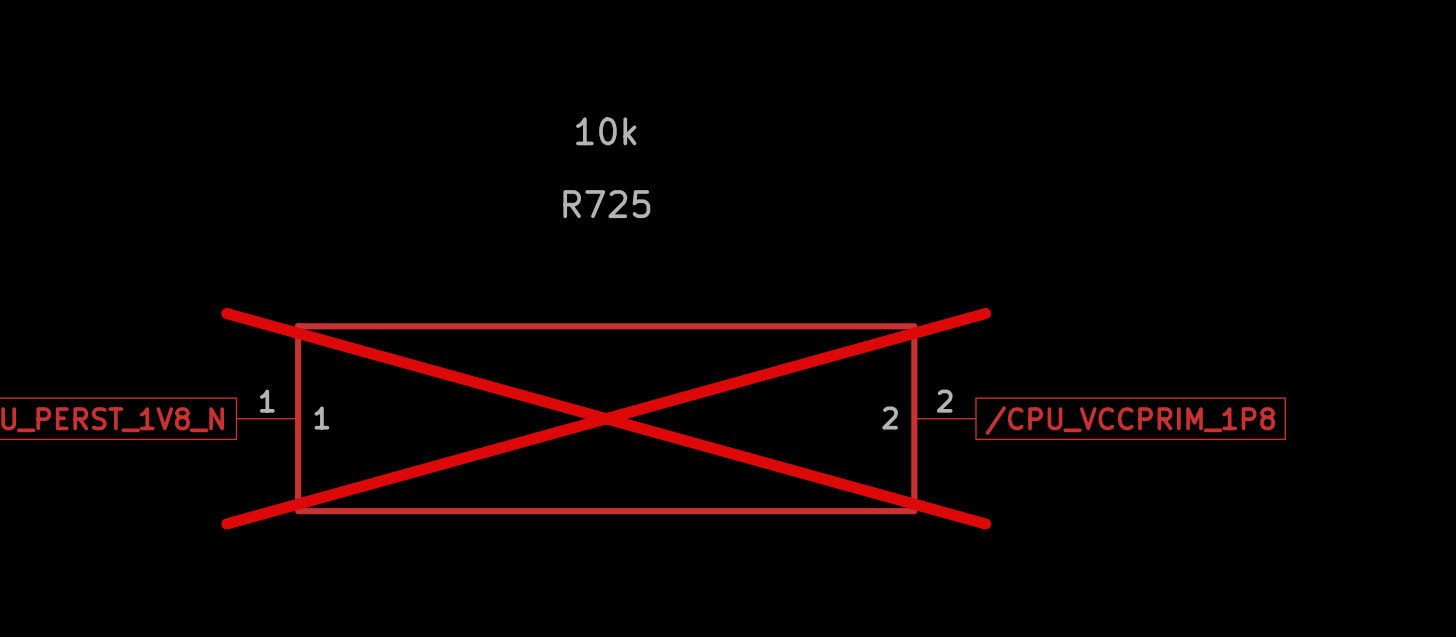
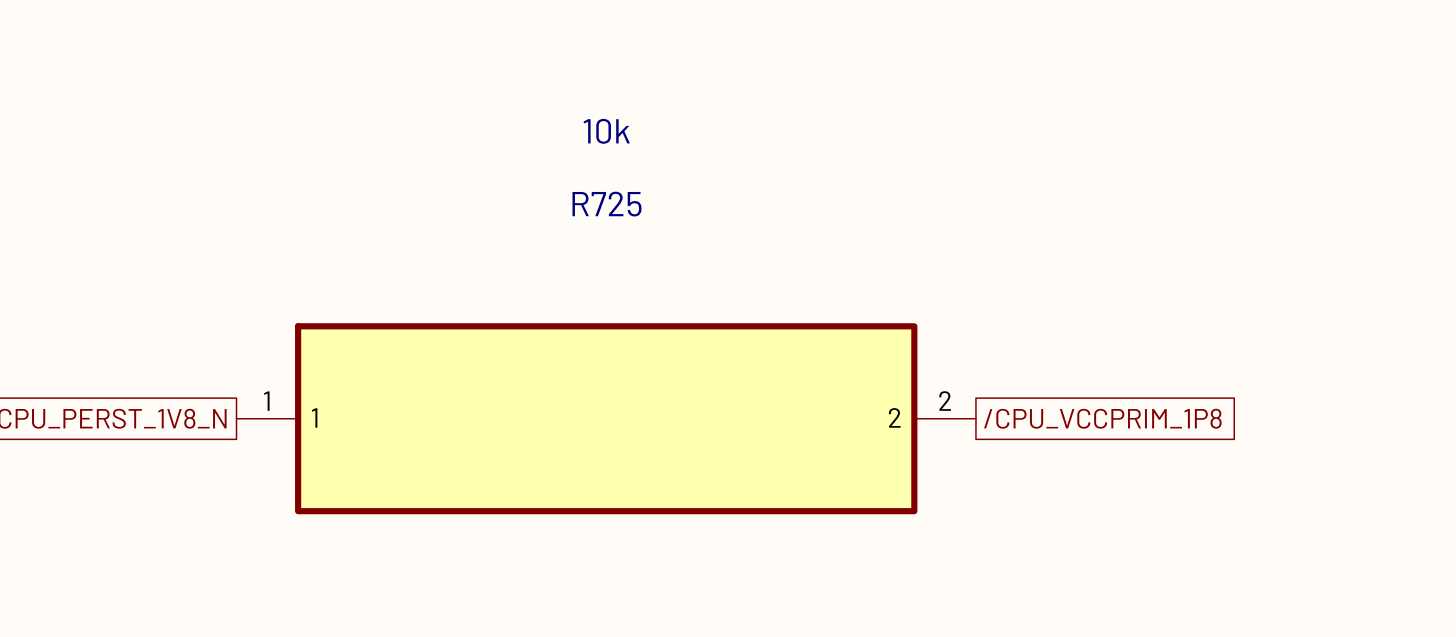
R725 do-not-place cross: (606, 418) -> none

